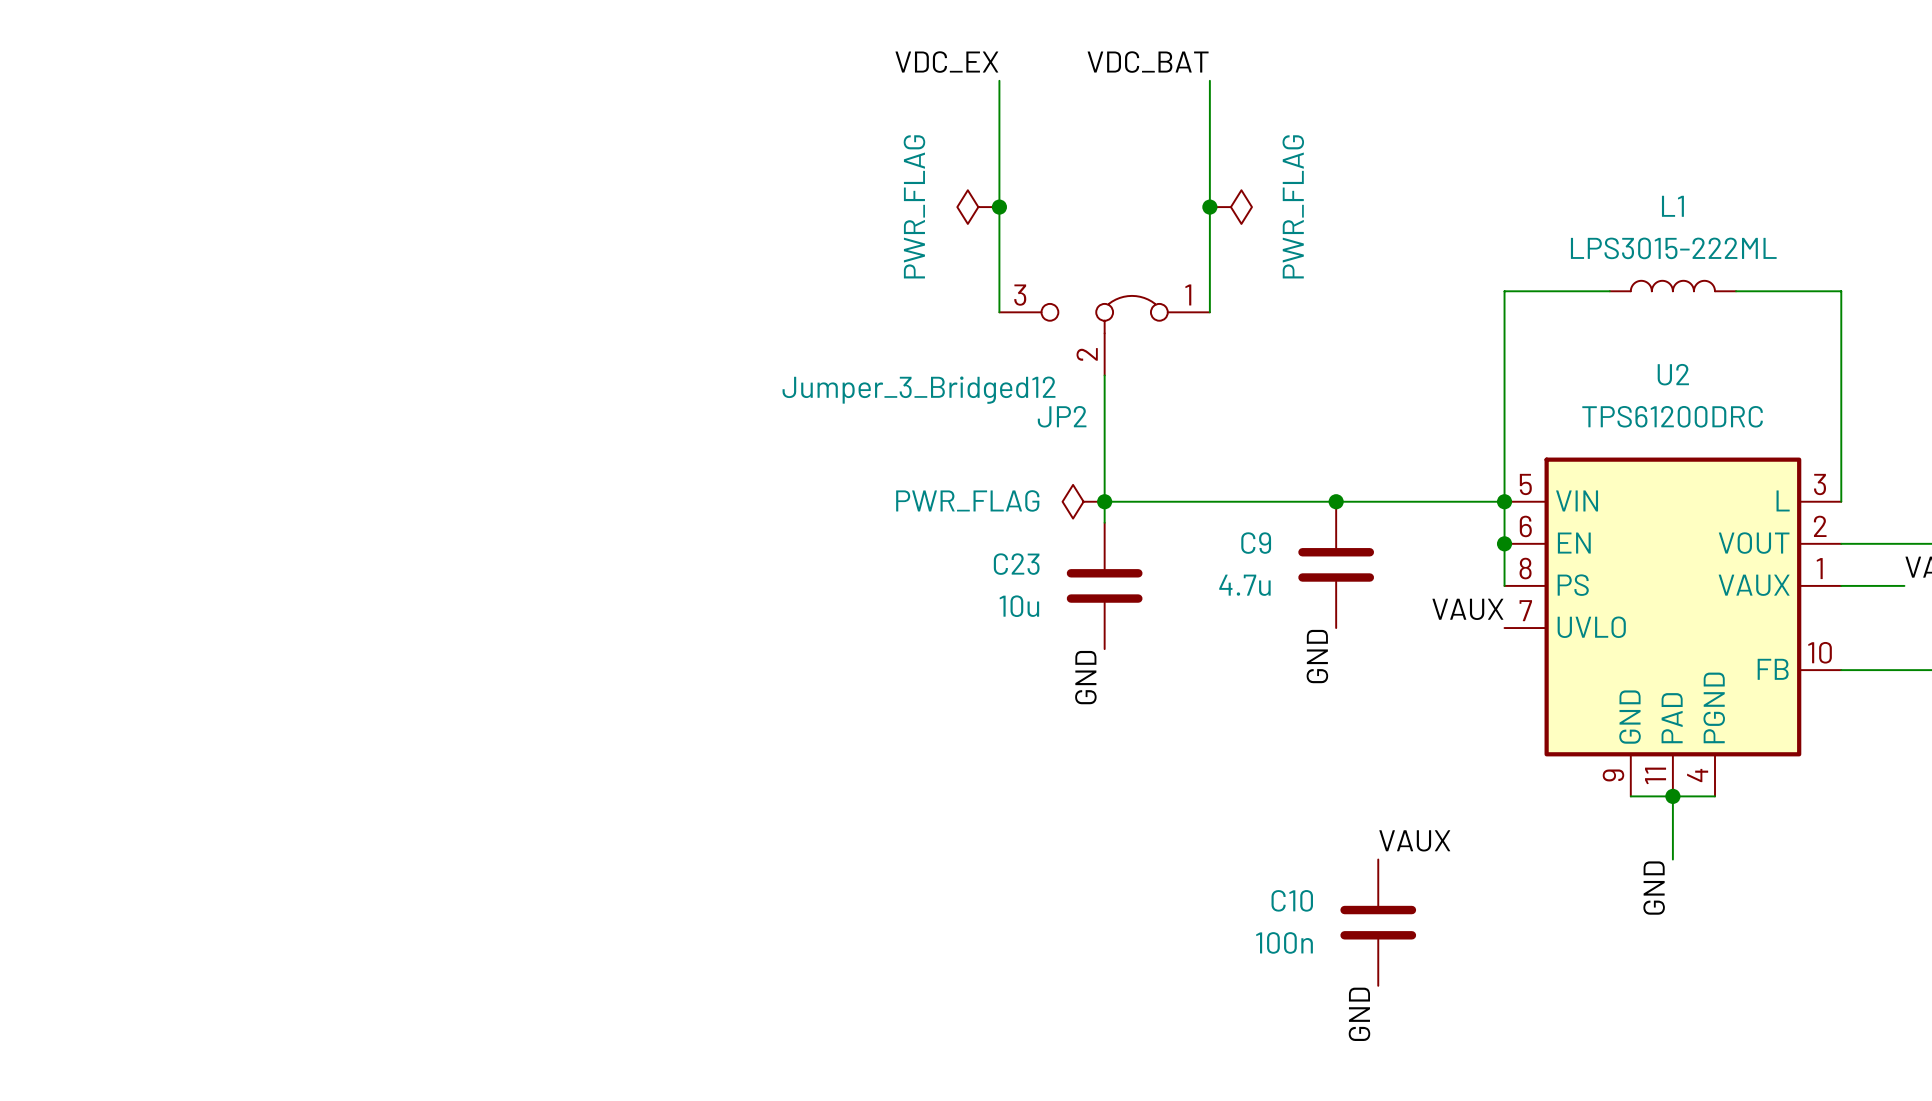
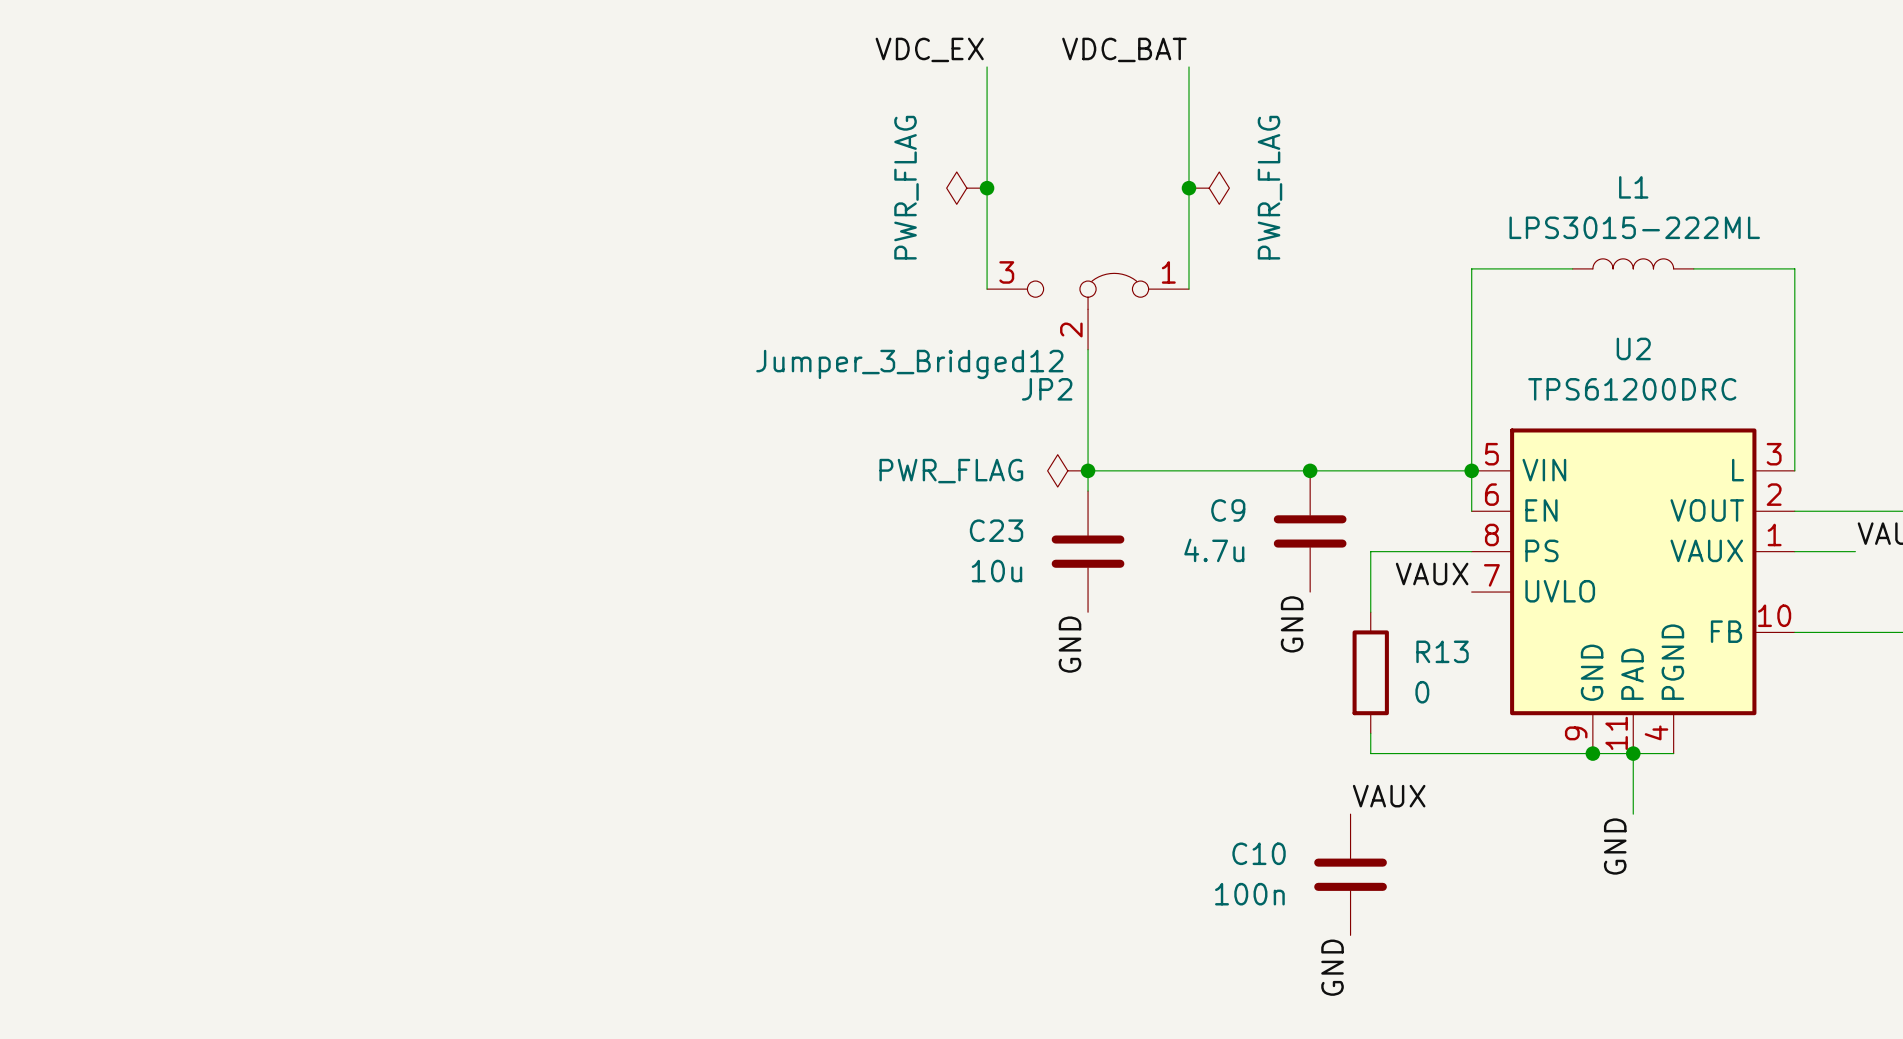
wire: (1504, 543) (1504, 585) -> (1370, 612) (1370, 551) (1471, 551)
junction: (1504, 543) -> none
R13: none -> 0 (1370, 672)
wire: none -> (1370, 733) (1370, 753) (1592, 753)
junction: none -> (1592, 753)

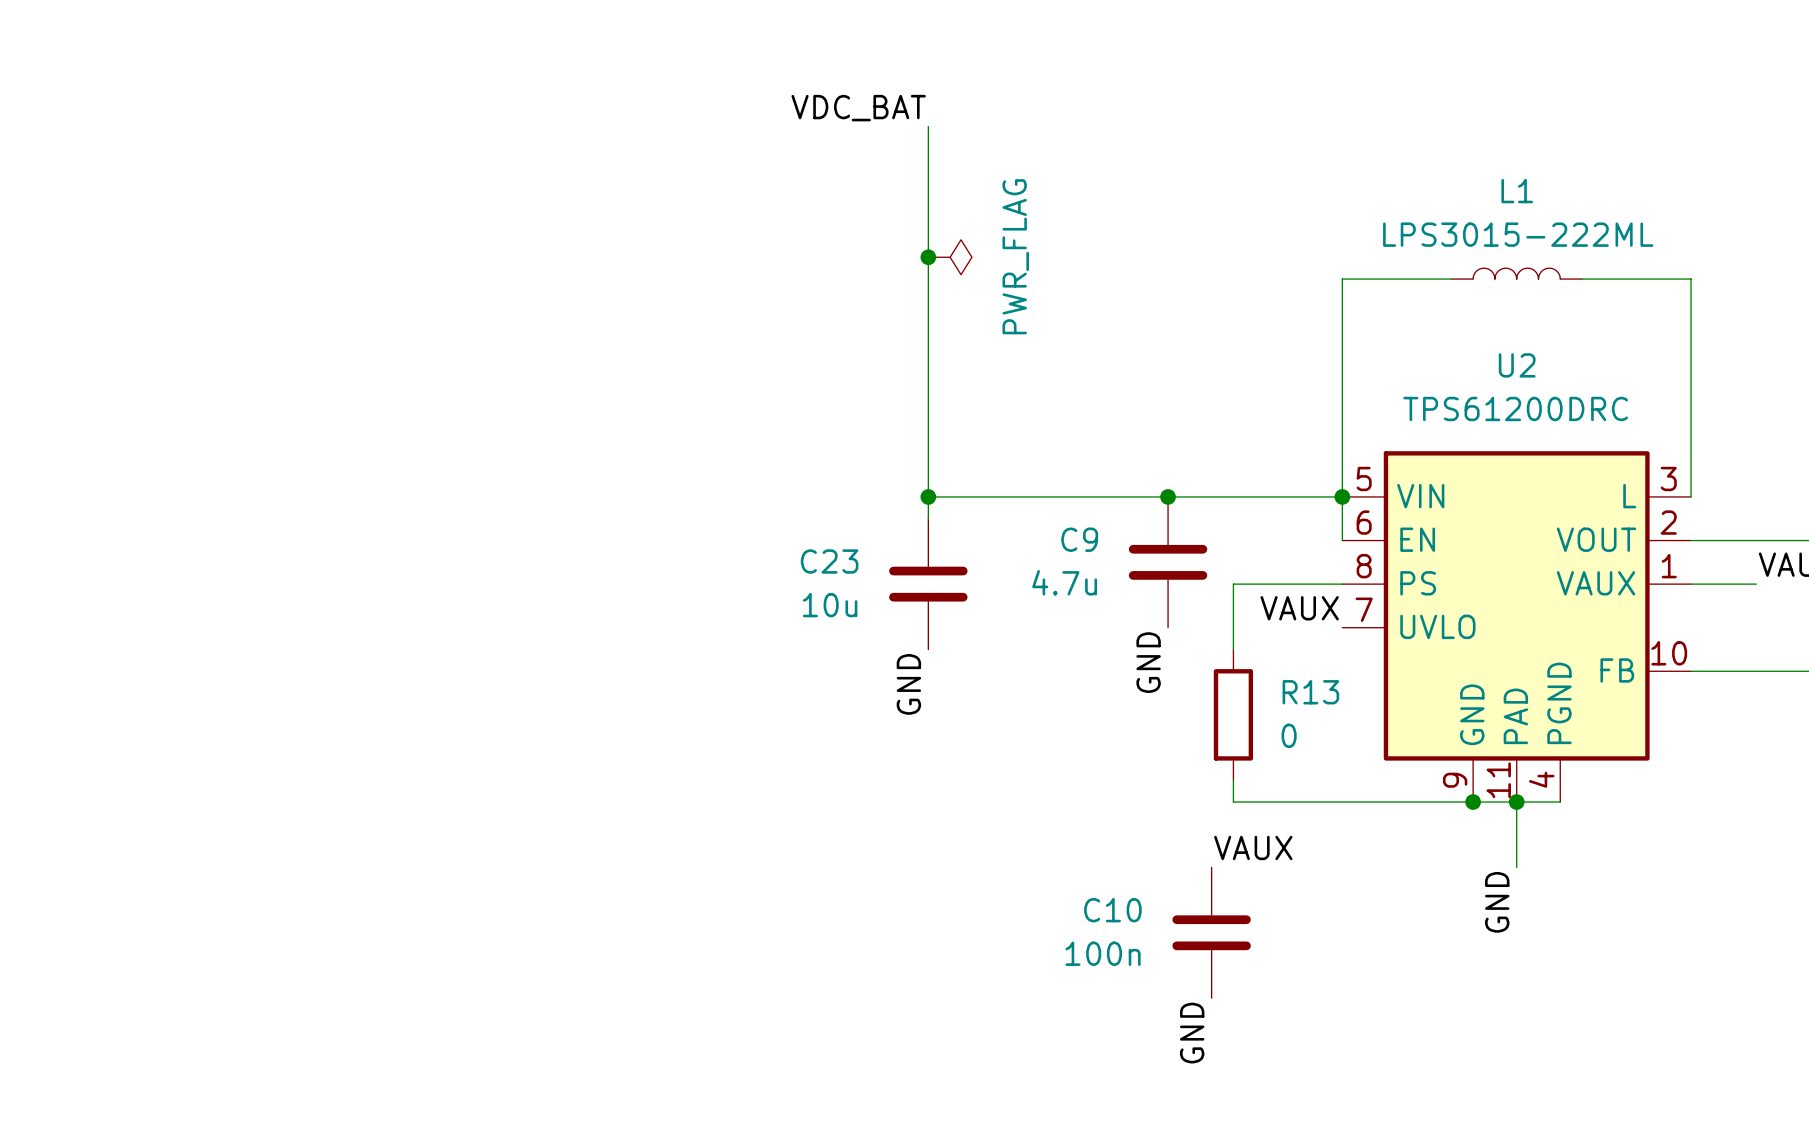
label: VDC_EX (929, 49) -> none
label position: VDC_BAT (1124, 49) -> VDC_BAT (858, 108)
wire: (987, 66) (987, 289) -> (928, 126) (928, 366)
wire: (1188, 66) (1188, 289) -> none
power symbol: PWR_FLAG (966, 188) -> none
junction: (987, 188) -> none
junction: (1188, 188) -> none
power symbol: PWR_FLAG (1209, 188) -> none
junction: none -> (928, 257)
power symbol: none -> PWR_FLAG (950, 257)
JP2: Jumper_3_Bridged12 (1088, 311) -> none
power symbol: PWR_FLAG (1067, 470) -> none

